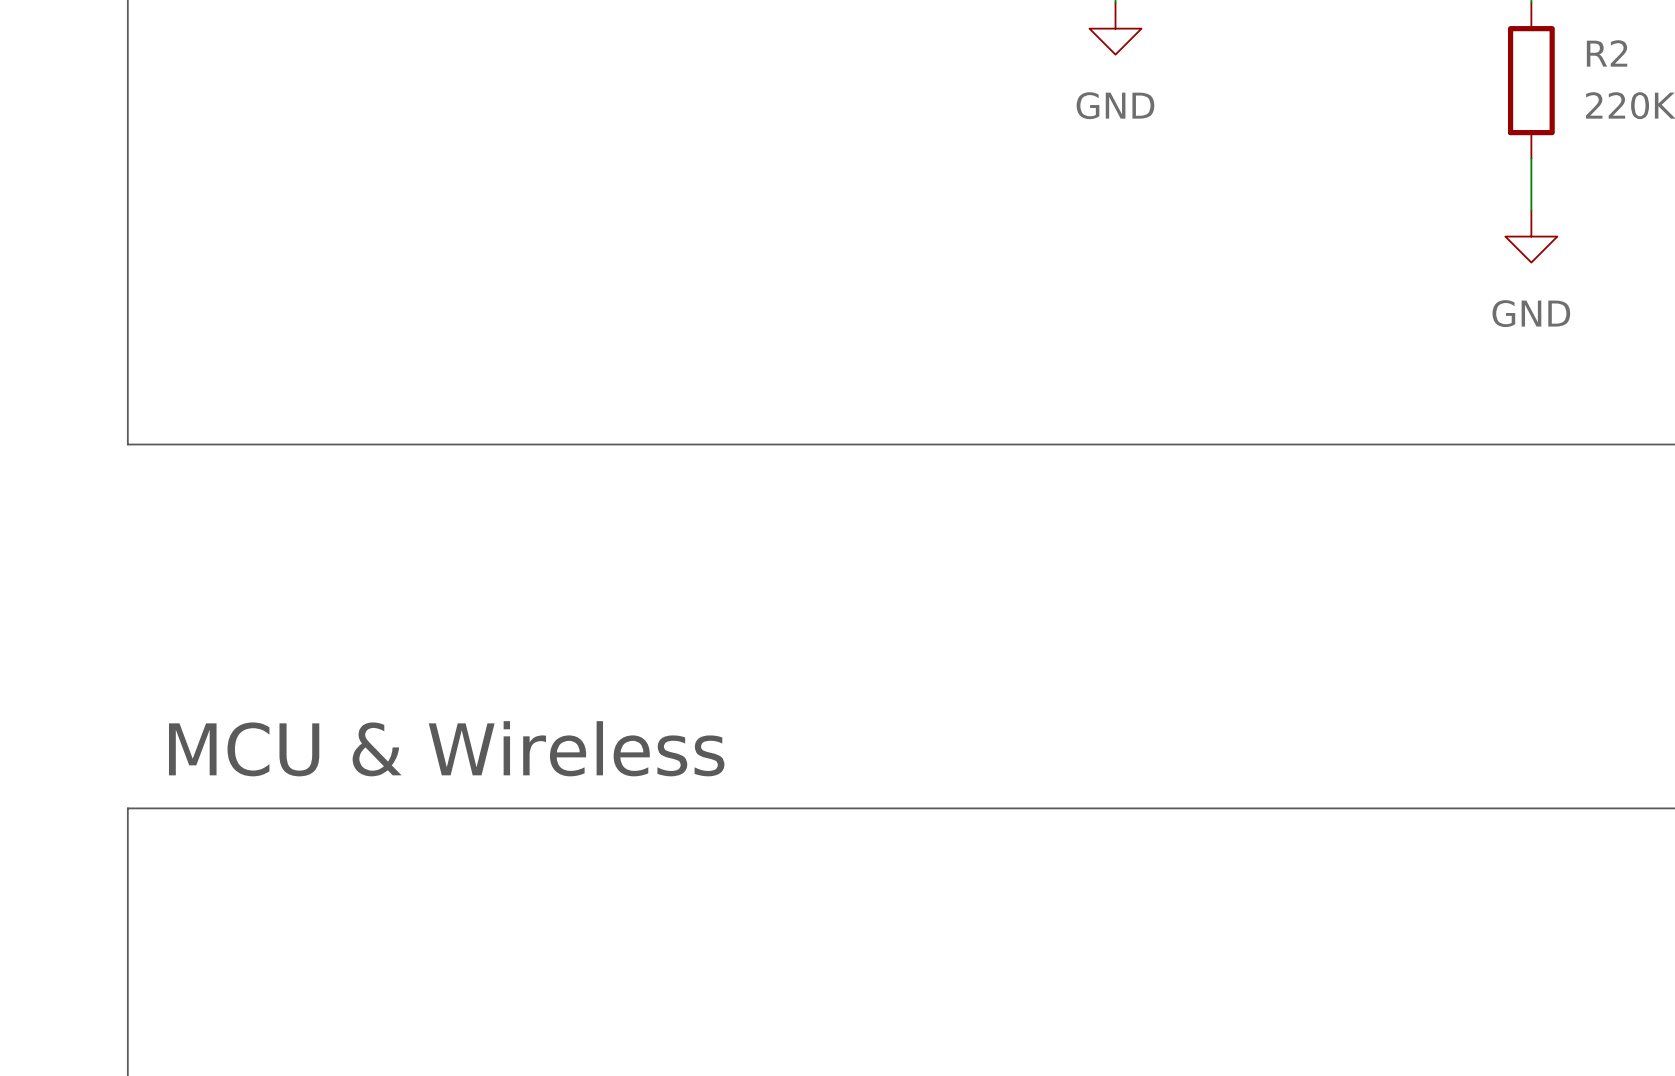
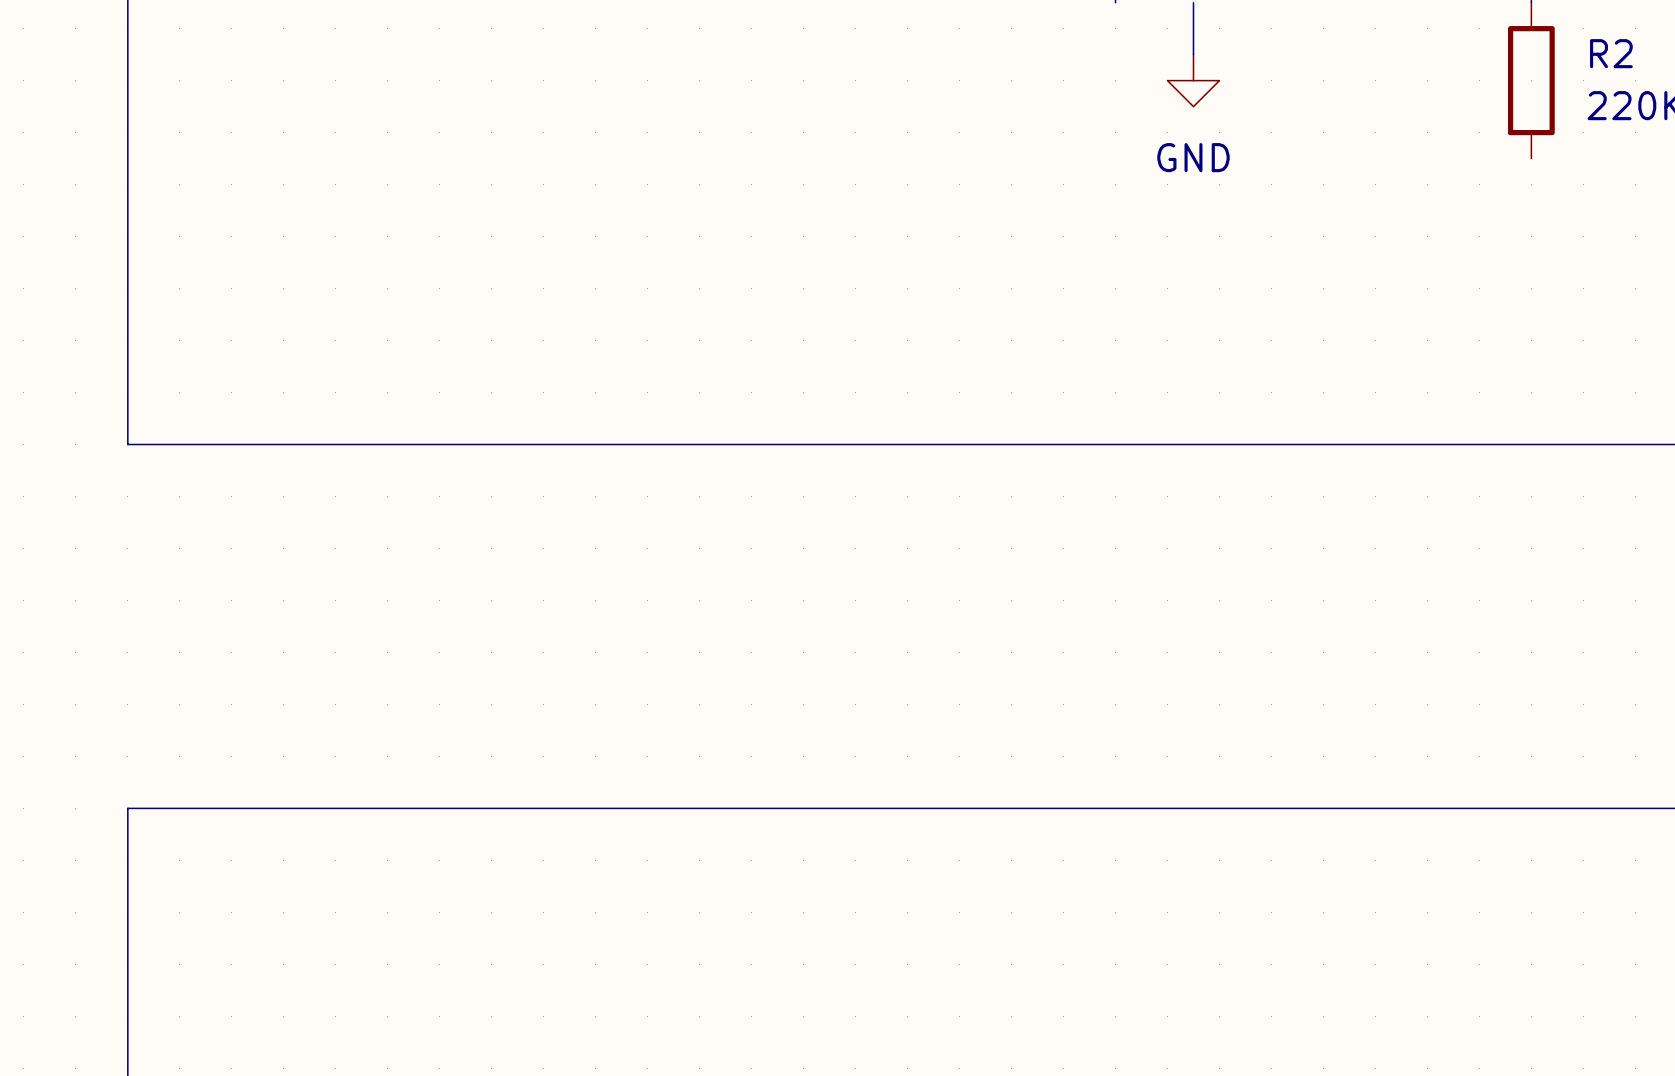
power symbol position: GND (1115, 28) -> GND (1193, 80)
wire: (1531, 158) (1531, 210) -> (1193, 2) (1193, 54)
power symbol: GND (1531, 236) -> none
text: MCU & Wireless (446, 748) -> none

